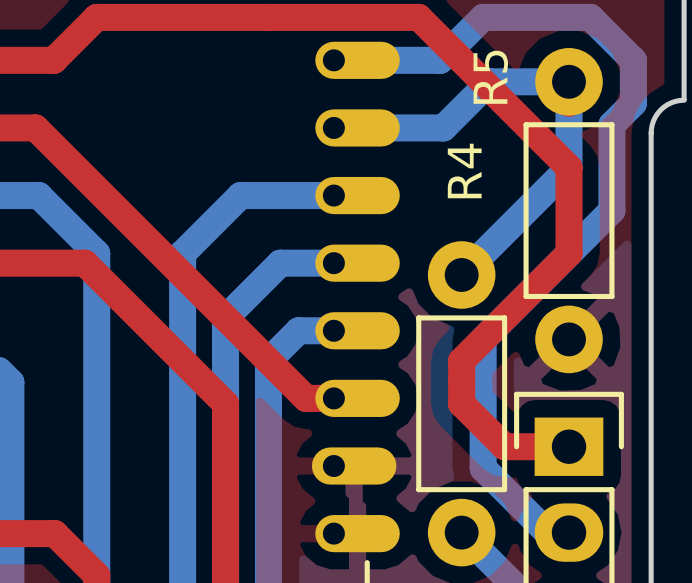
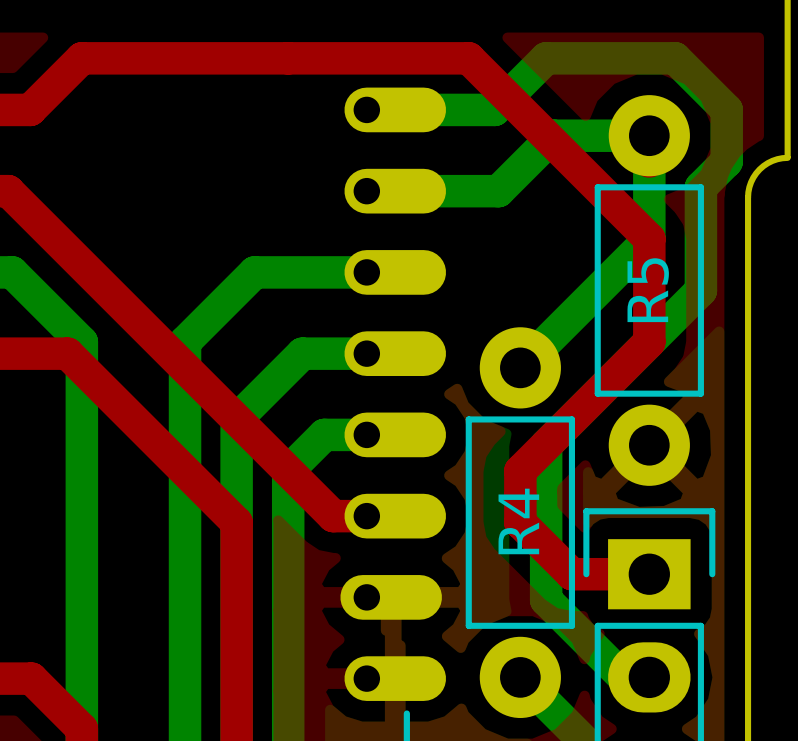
R5 name position: R5 (490, 77) -> R5 (648, 290)
R4 name position: R4 (464, 170) -> R4 (518, 521)

